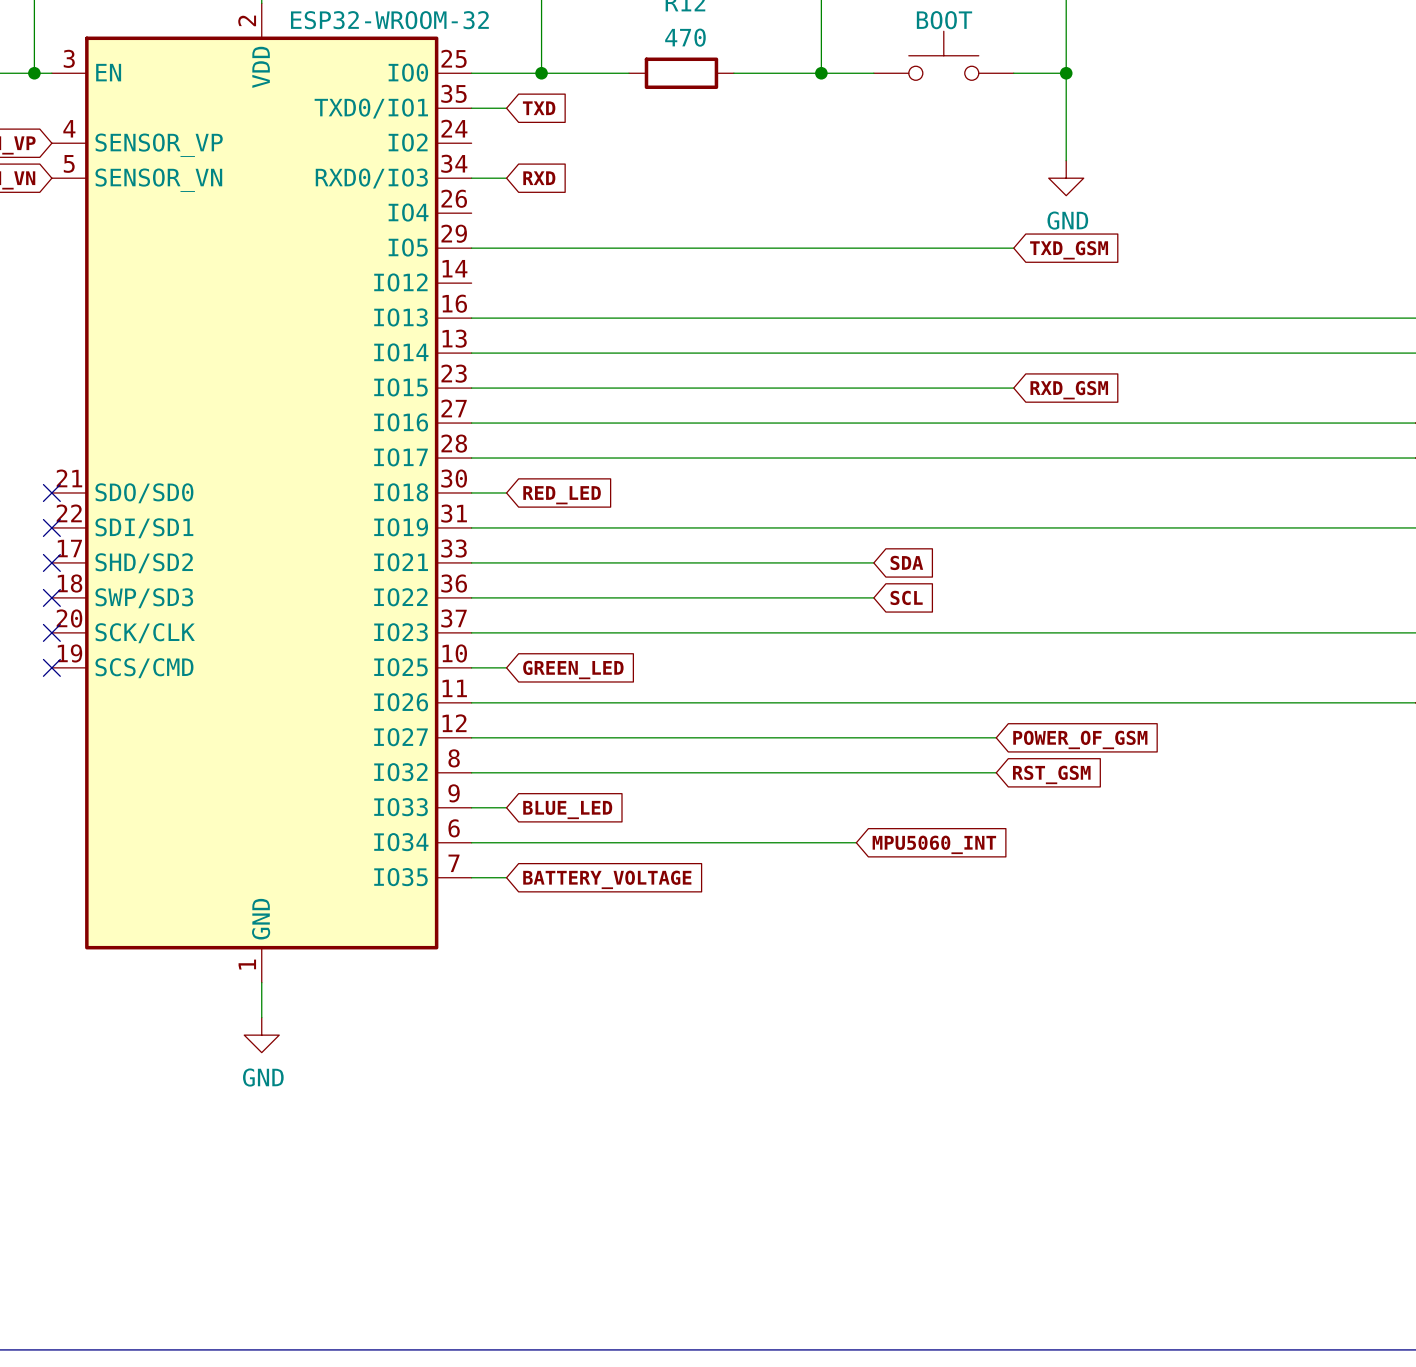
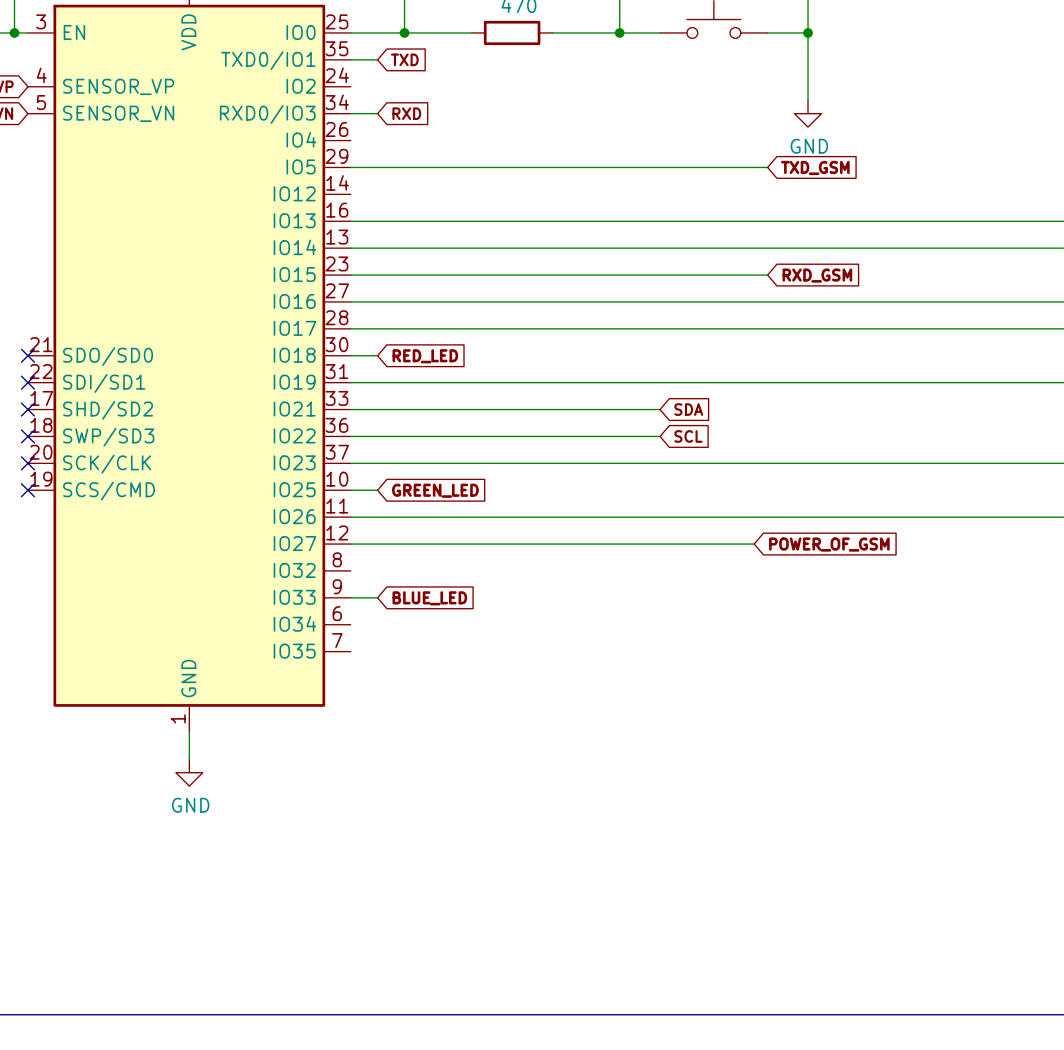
wire: (471, 772) (996, 772) -> none
global label: RST_GSM (1051, 774) -> none
wire: (471, 842) (856, 842) -> none
global label: MPU5060_INT (934, 844) -> none
wire: (471, 877) (506, 877) -> none
global label: BATTERY_VOLTAGE (607, 879) -> none

